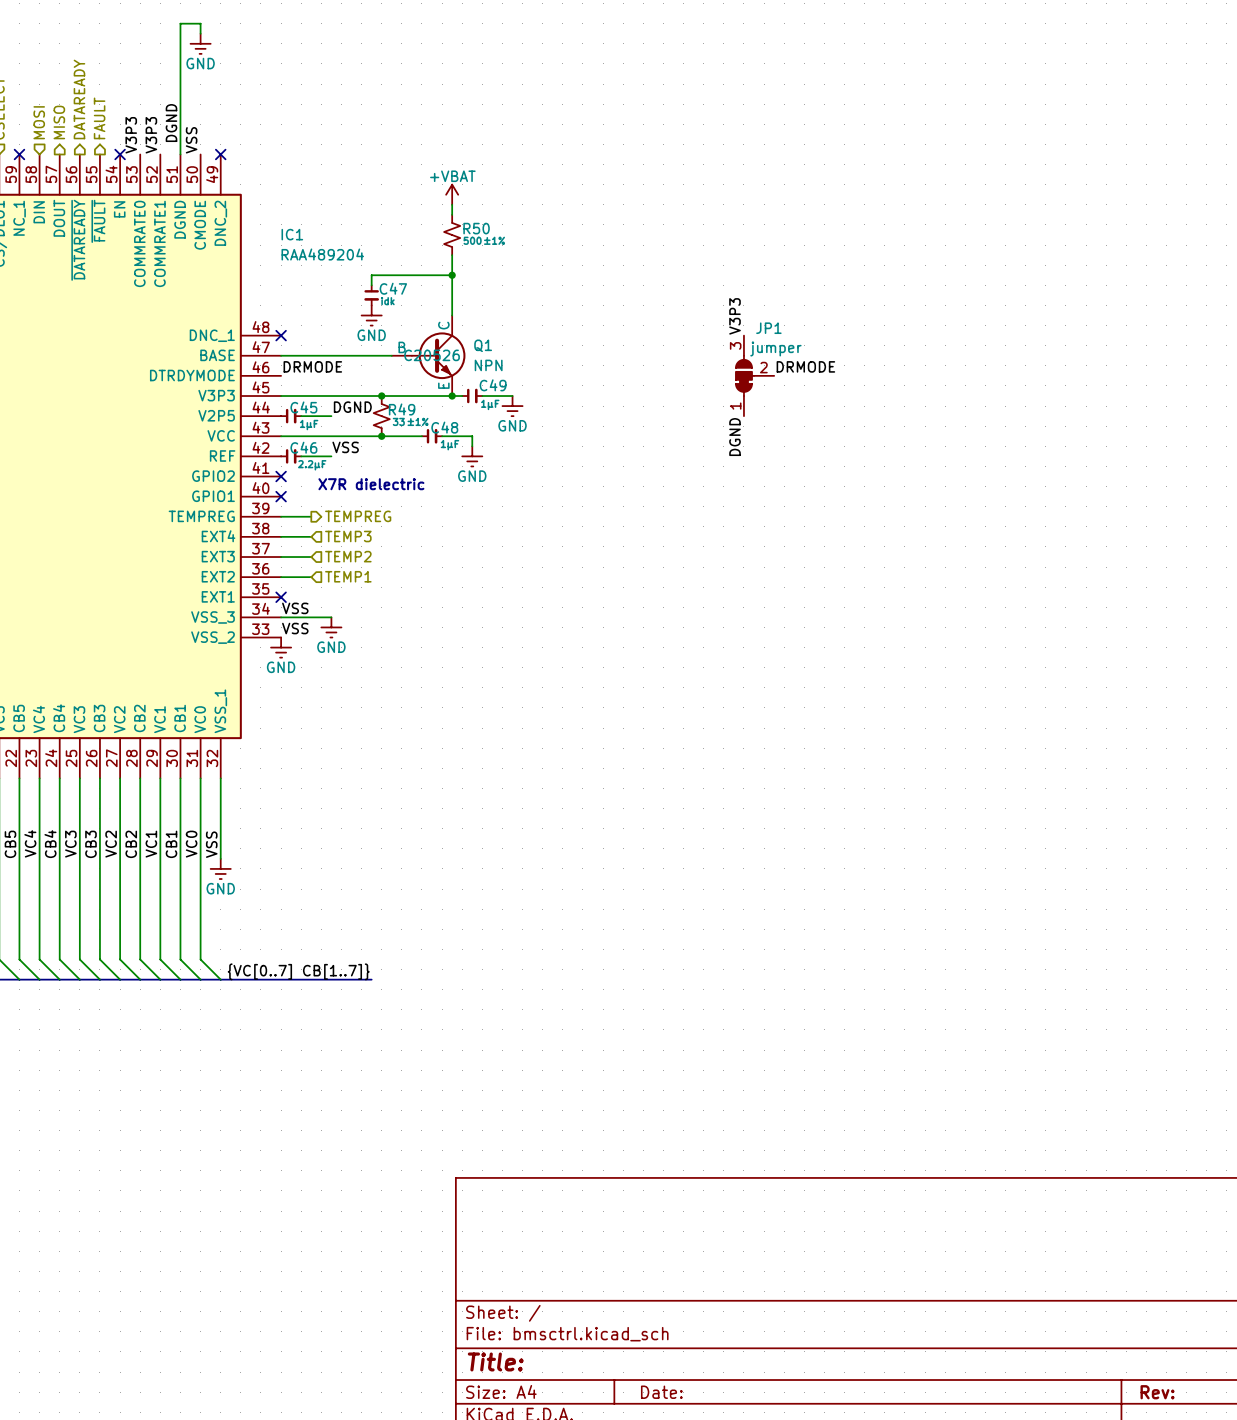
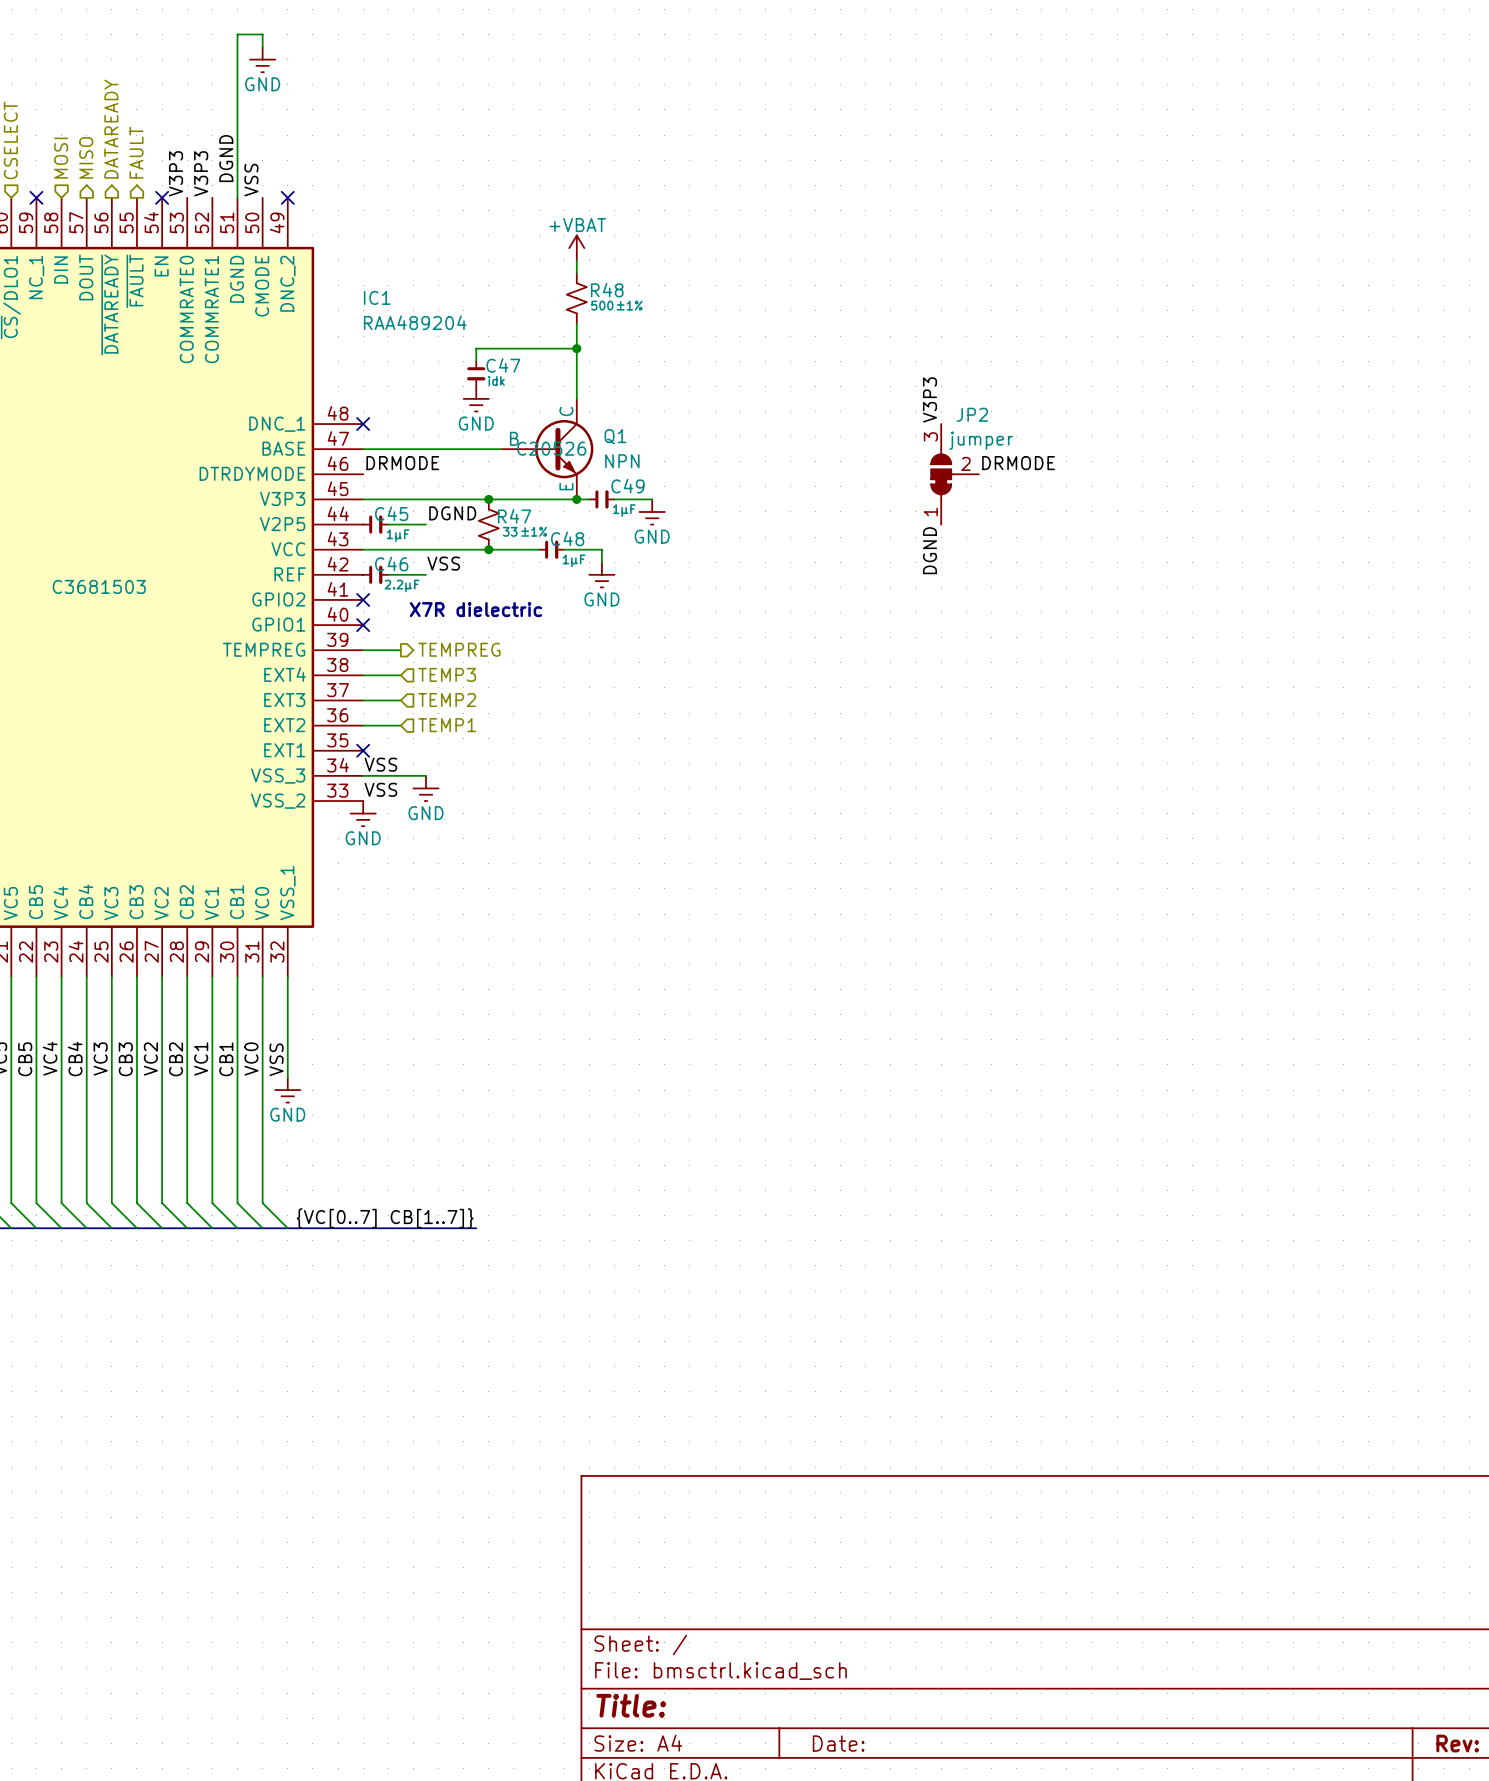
R50 name: R50 (476, 228) -> R48 (607, 290)
JP1 name: JP1 (768, 328) -> JP2 (972, 414)
R49 name: R49 (402, 409) -> R47 (514, 516)
IC1 text: none -> C3681503 (99, 586)

